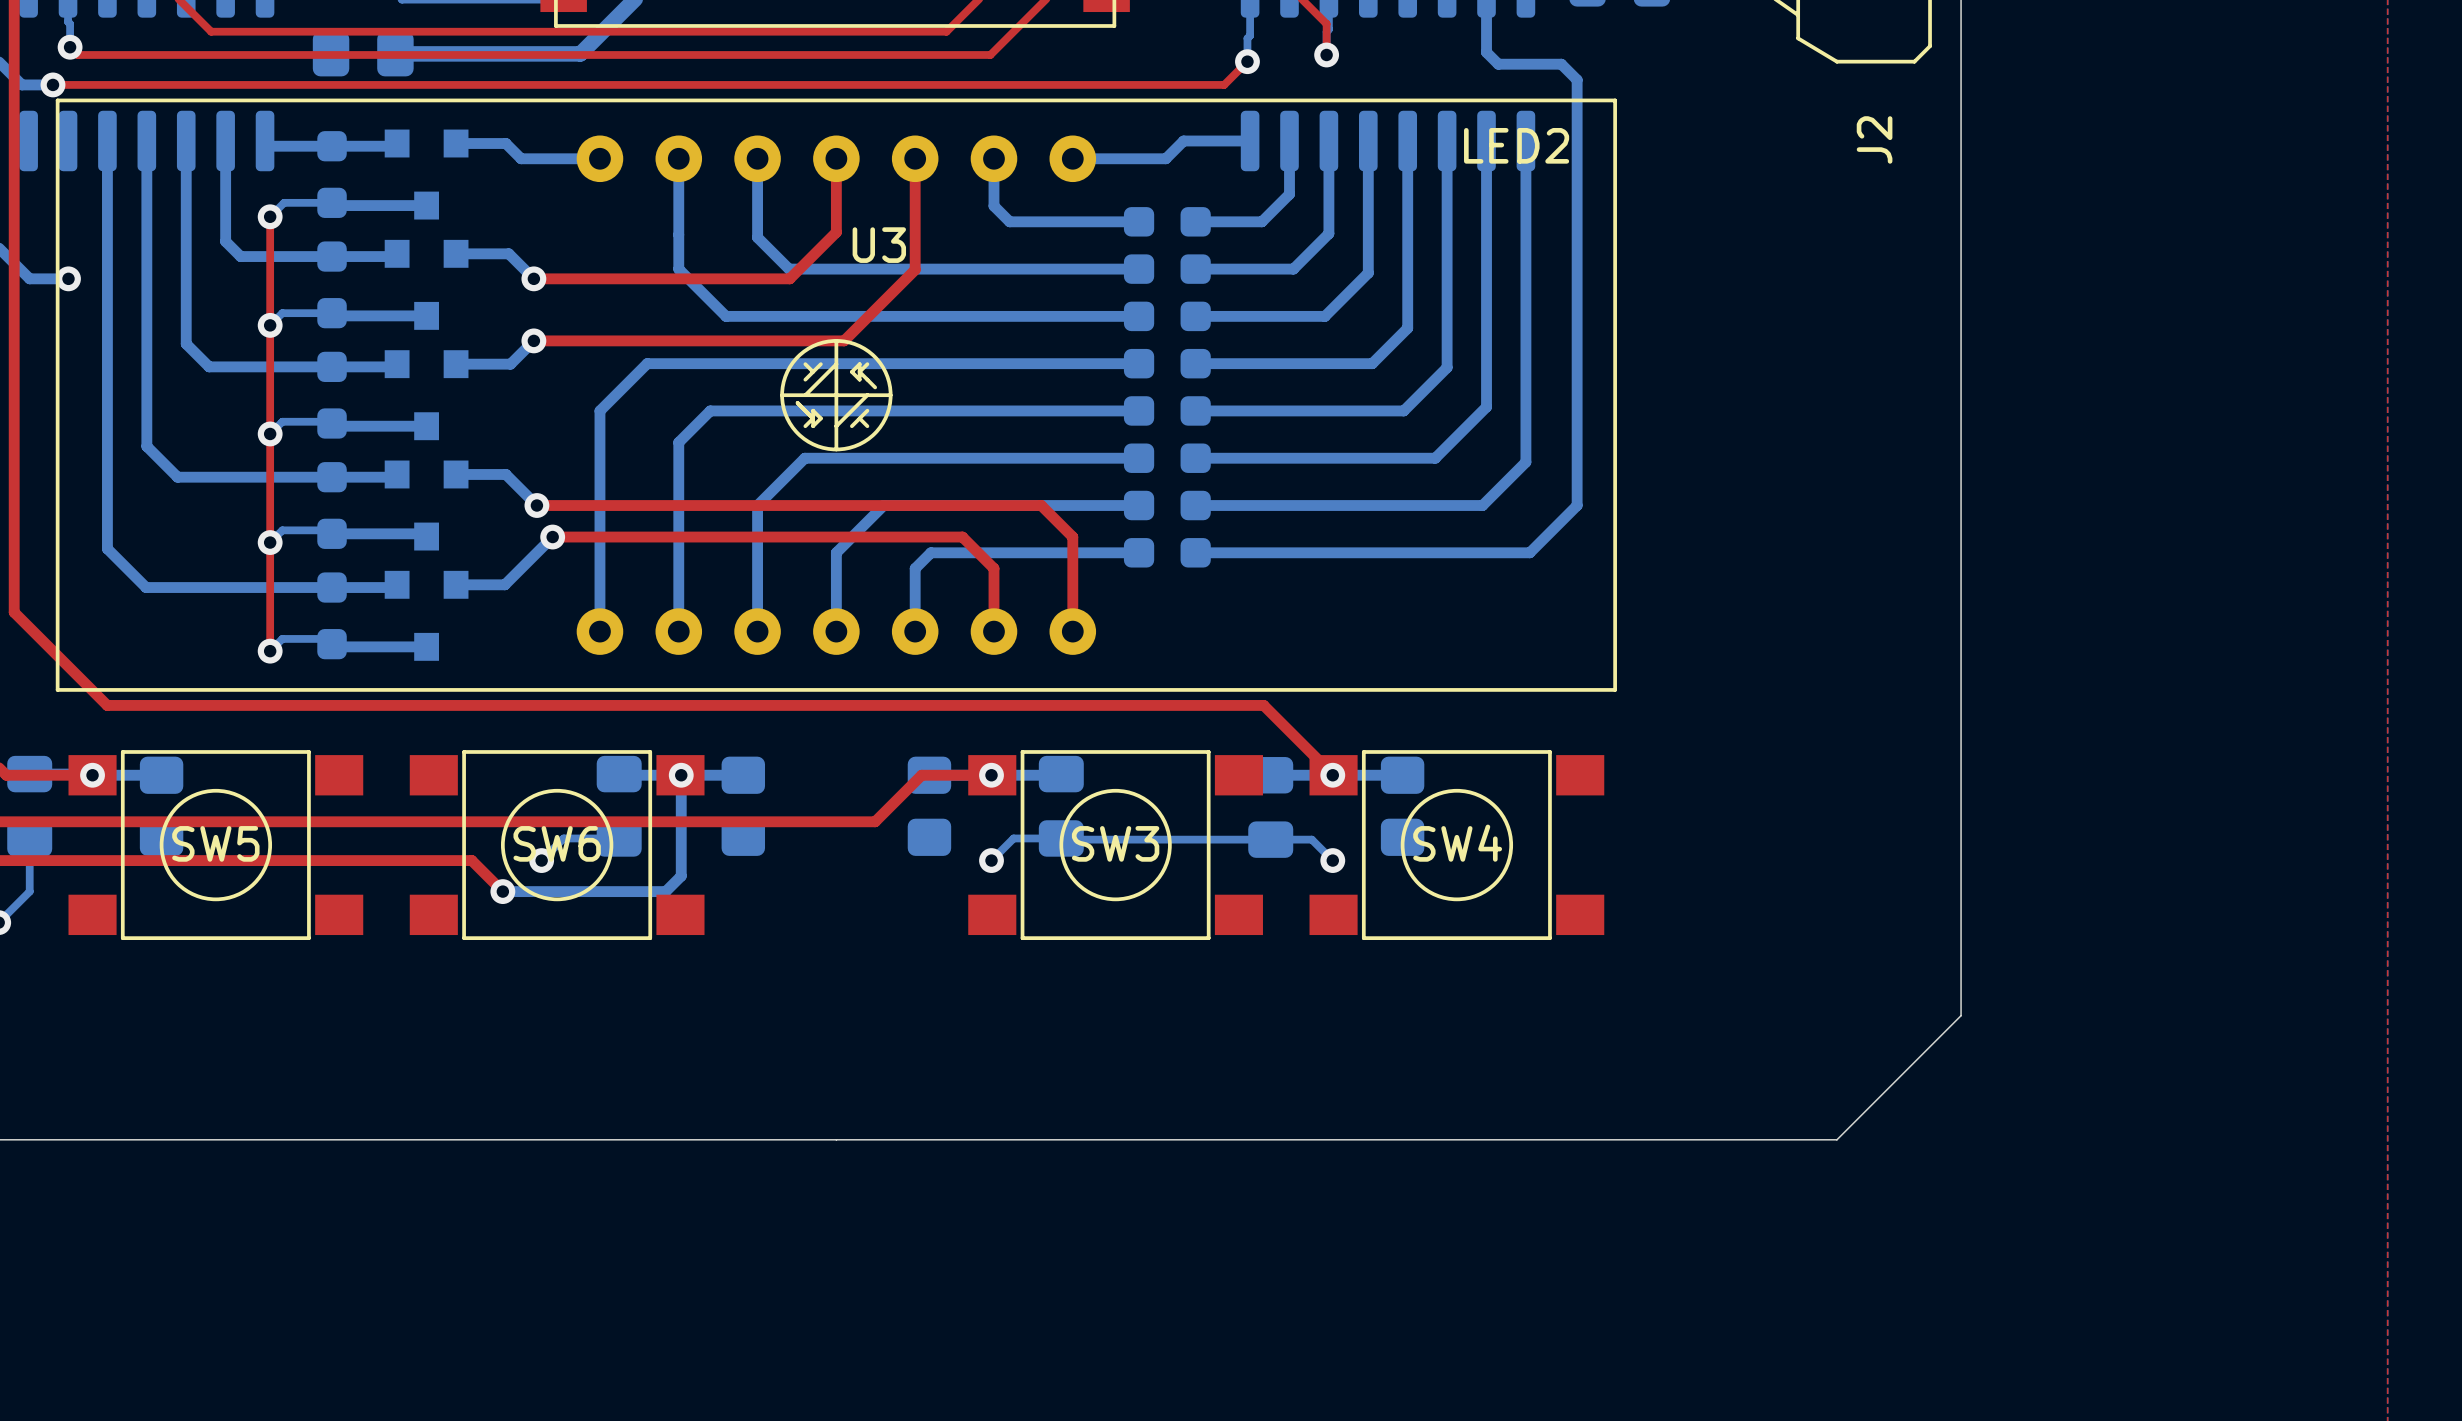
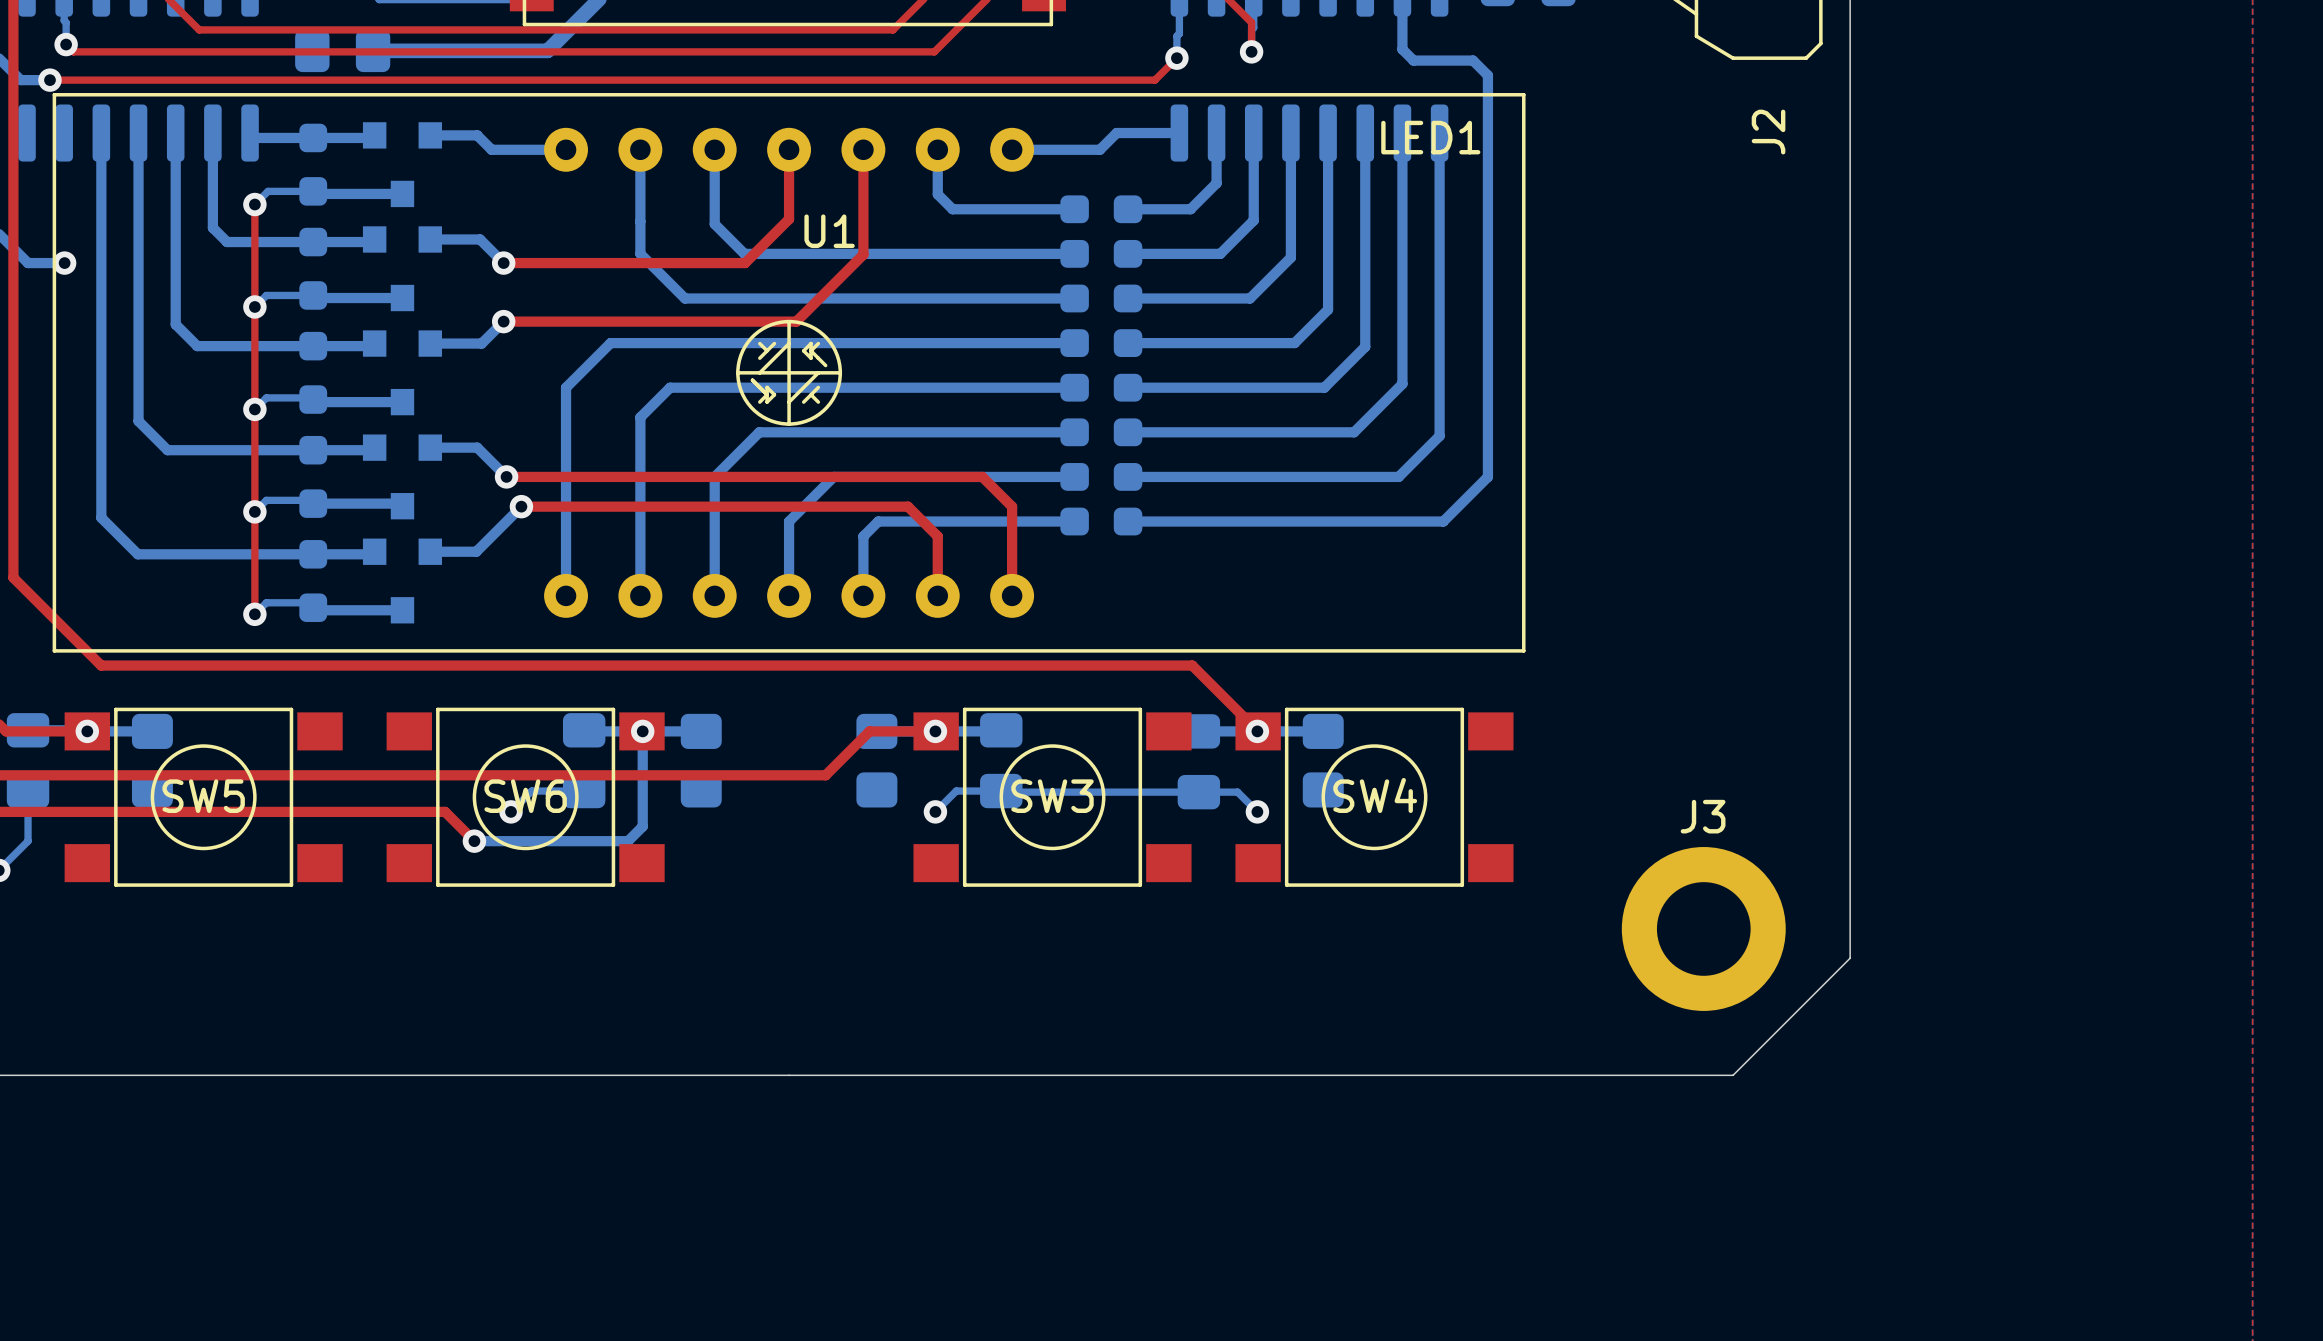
LED2 name: LED2 (1516, 145) -> LED1 (1430, 137)
U3 name: U3 (879, 245) -> U1 (829, 231)
J3: none -> (1703, 928)

